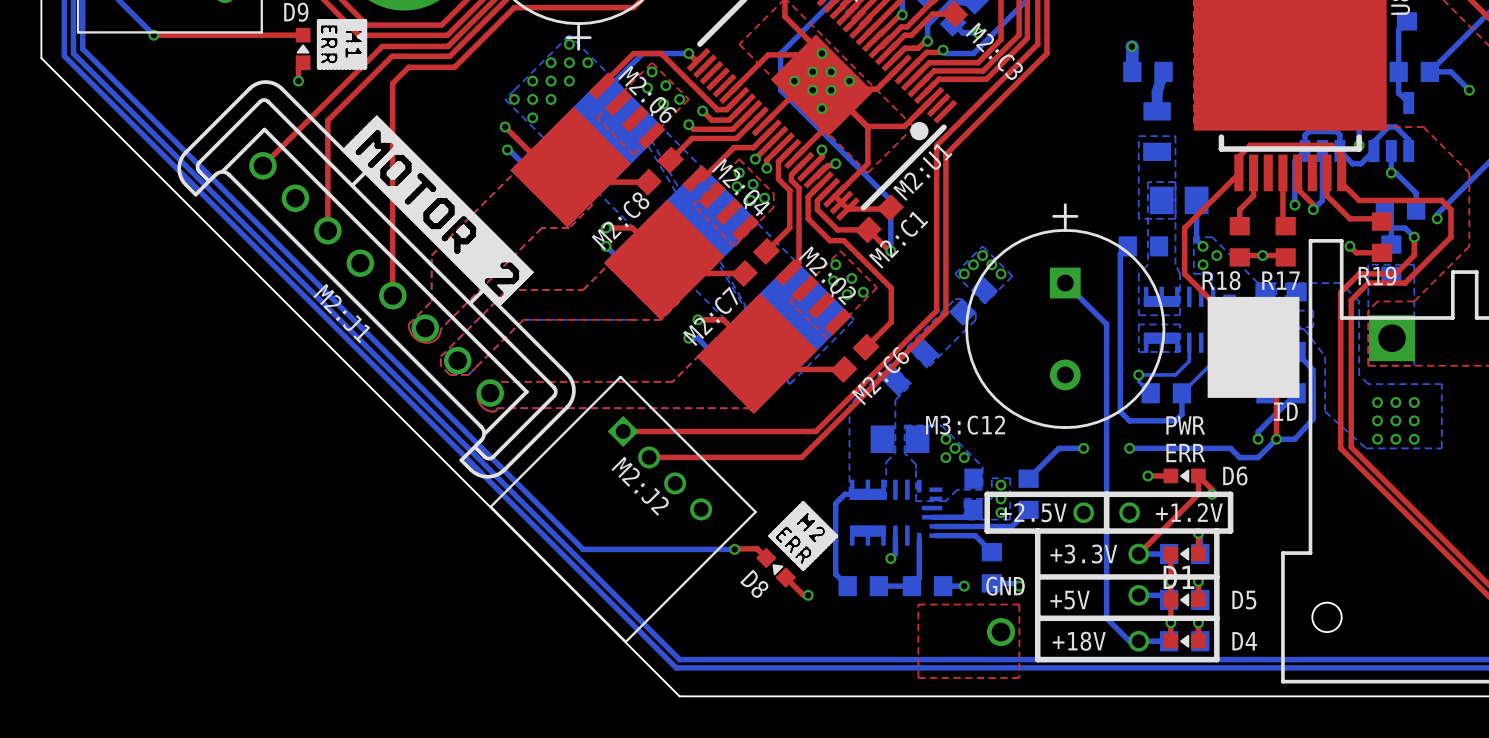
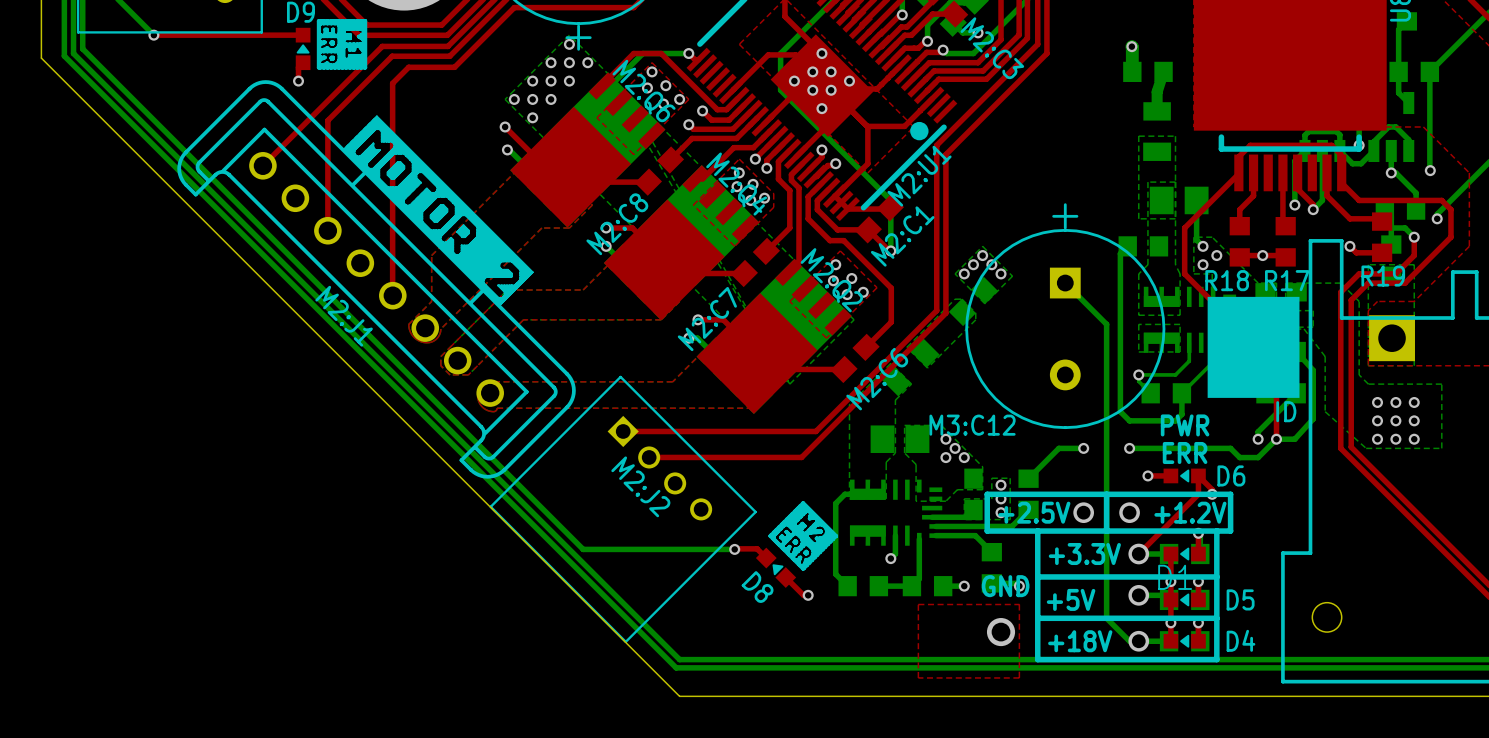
bottom track: (1429, 71) (1450, 71) (1469, 90) -> (1429, 71) (1430, 170)
via position: (1469, 90) -> (1430, 170)

